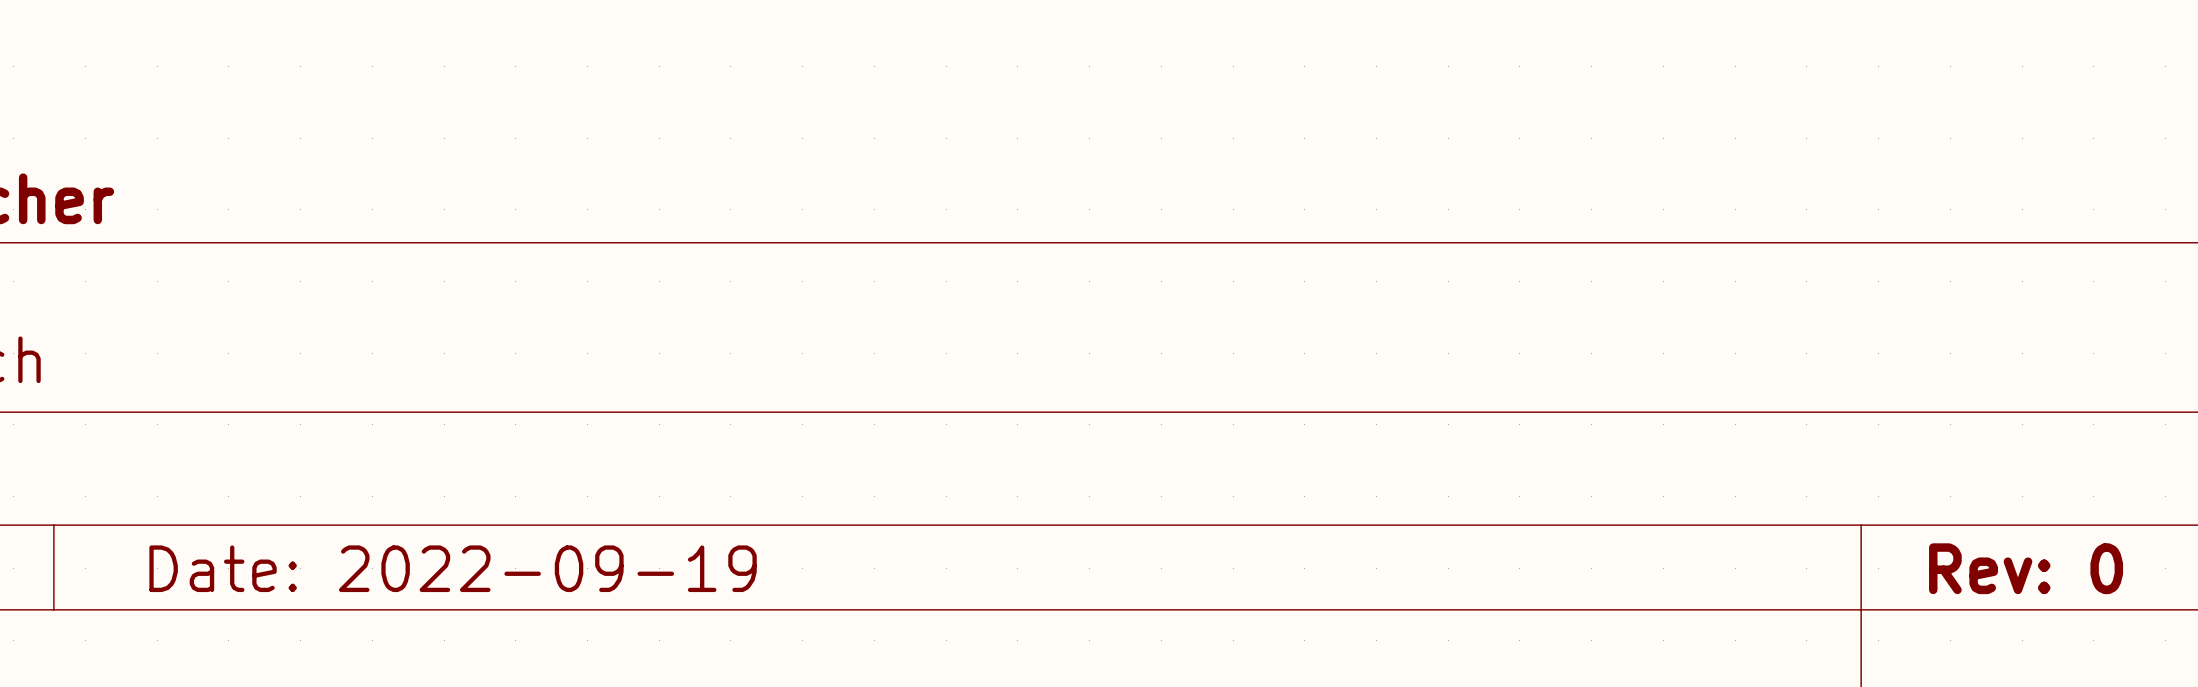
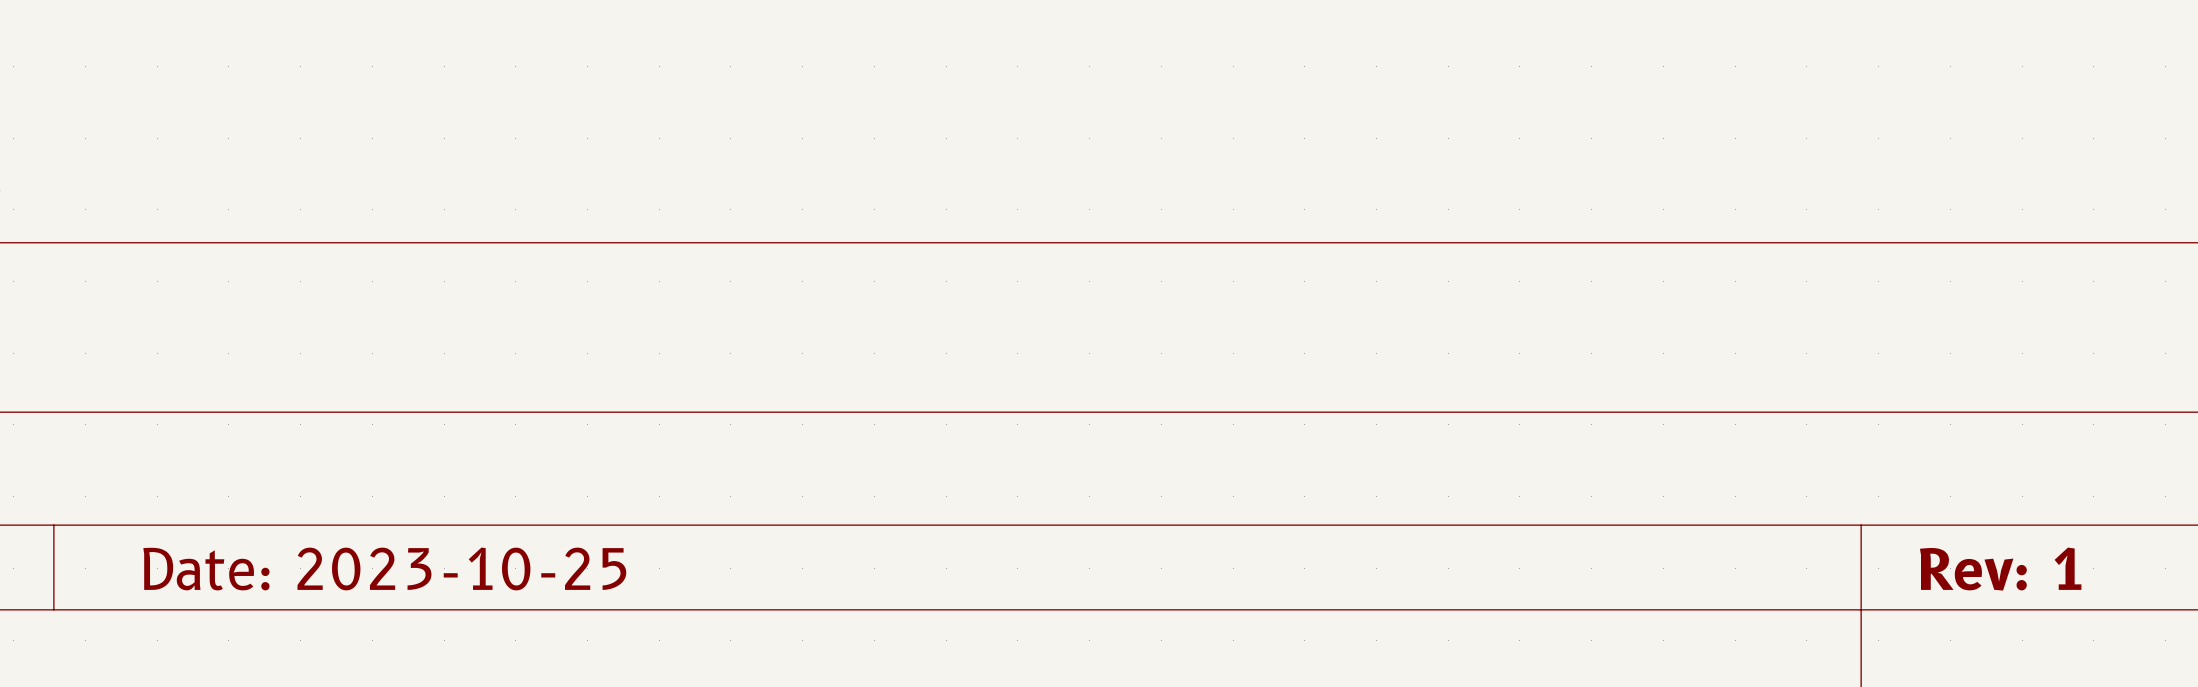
title block: Date: 2022-09-19 (453, 568) -> Date: 2023-10-25 (384, 568)
title block: Rev: 0 (2026, 568) -> Rev: 1 (2000, 569)

